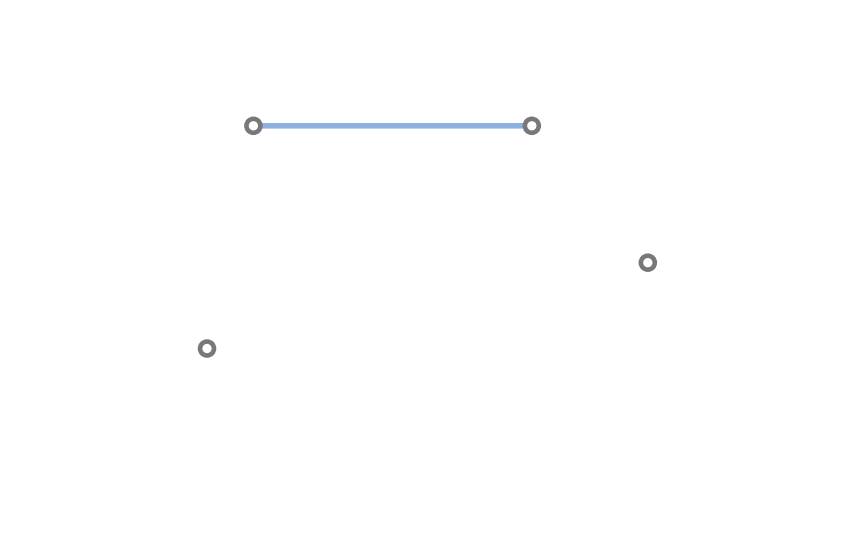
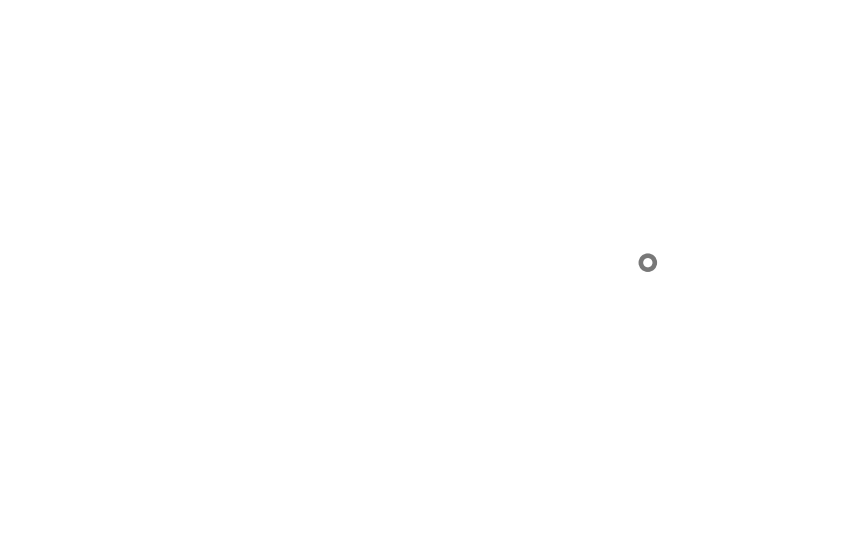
via: (253, 125) -> none
track: (531, 125) (253, 125) -> none
via: (531, 125) -> none
via: (207, 348) -> none

